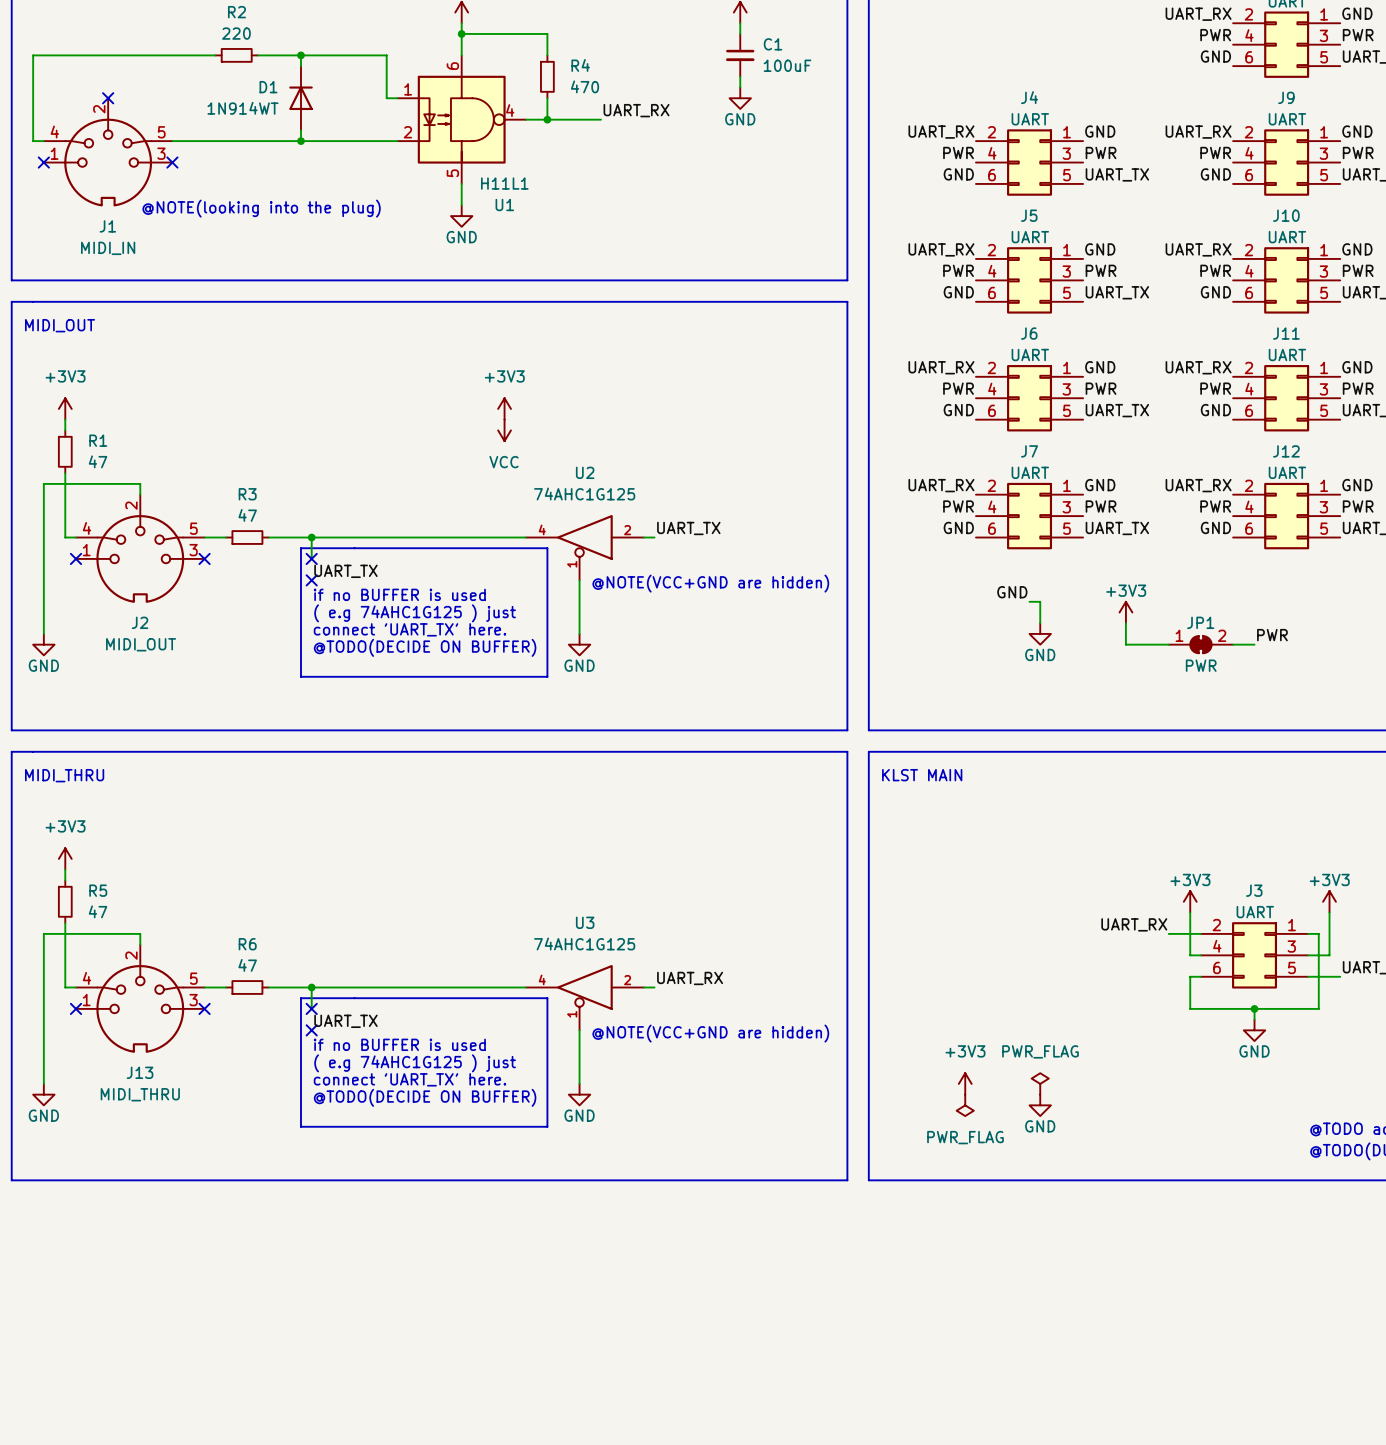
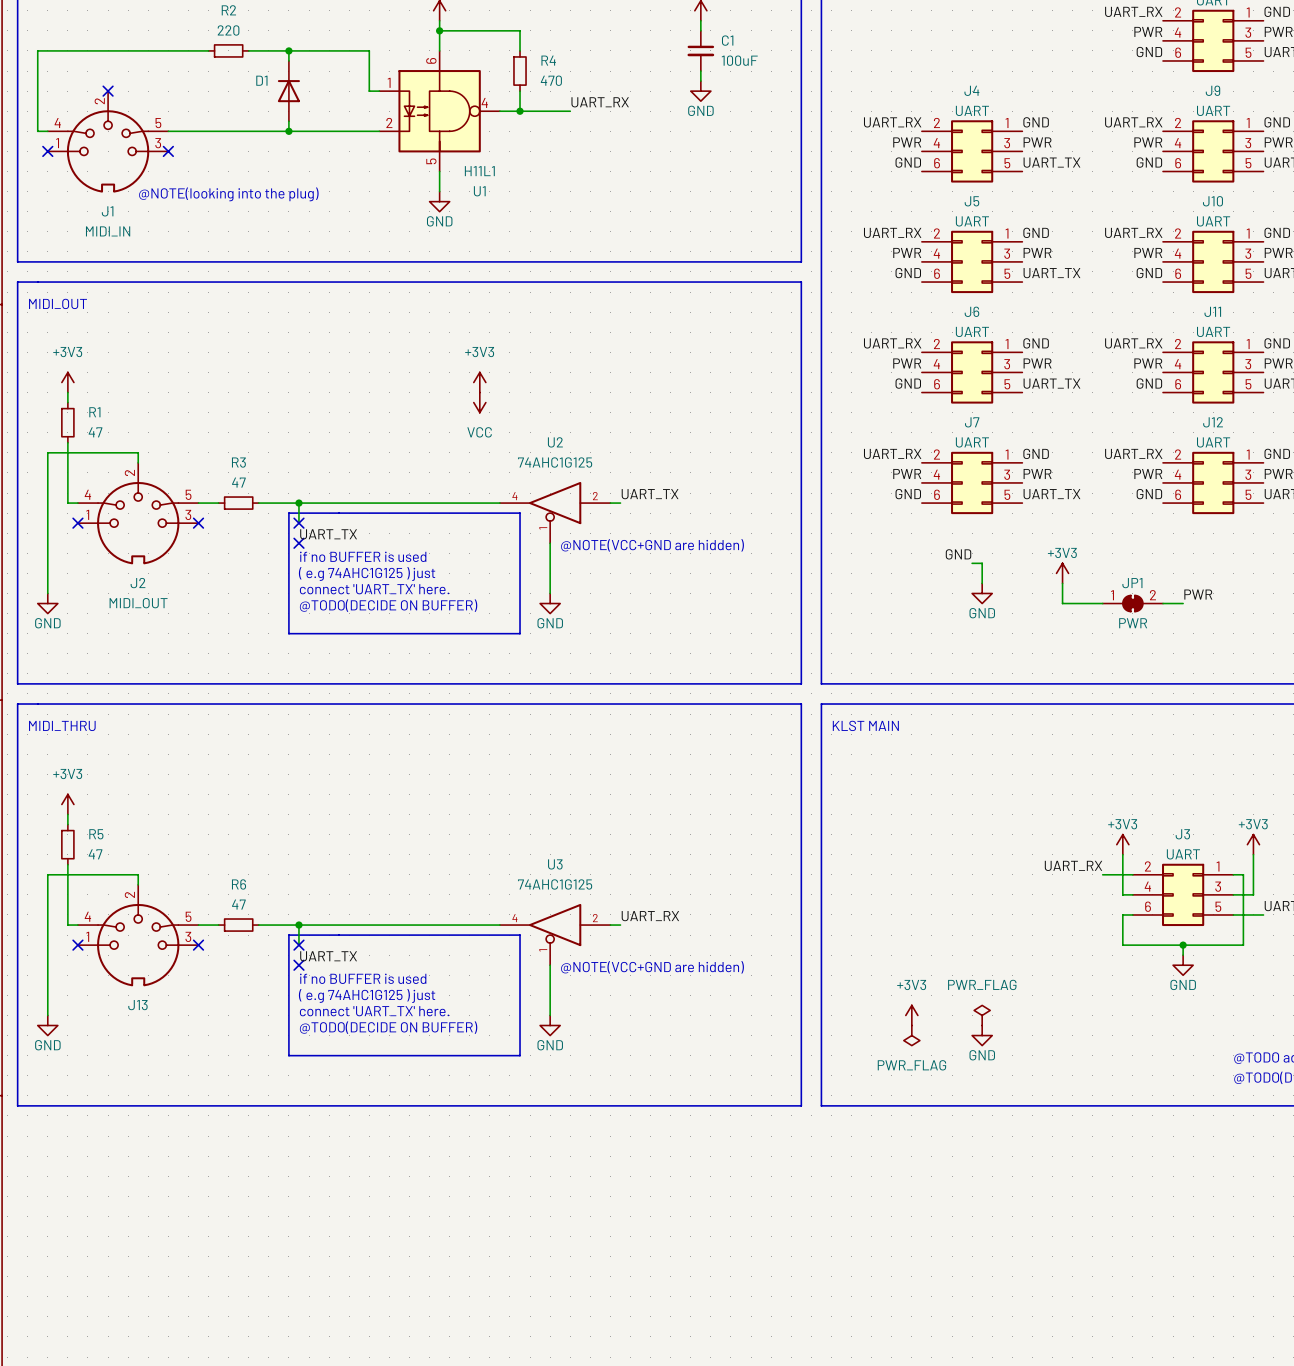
D1 value: 1N914WT (243, 108) -> none
J13 value: MIDI_THRU (140, 1094) -> none

